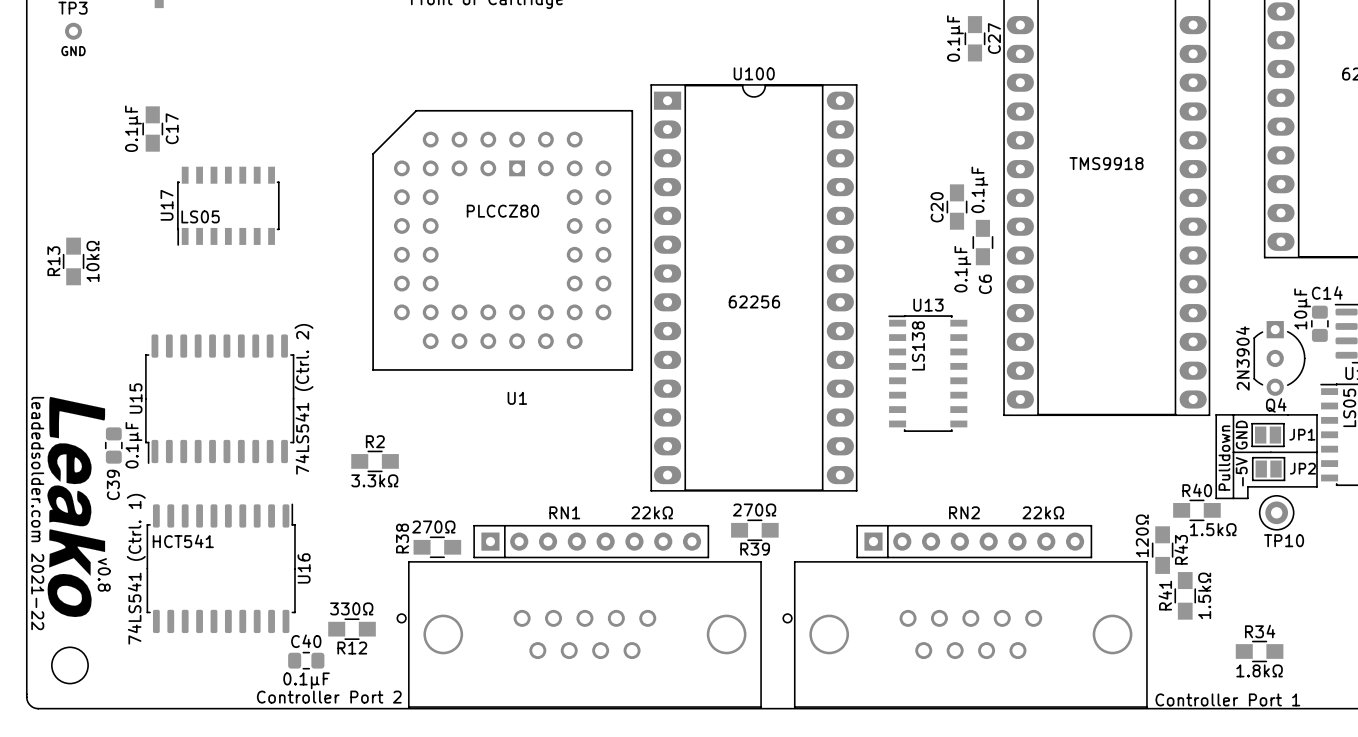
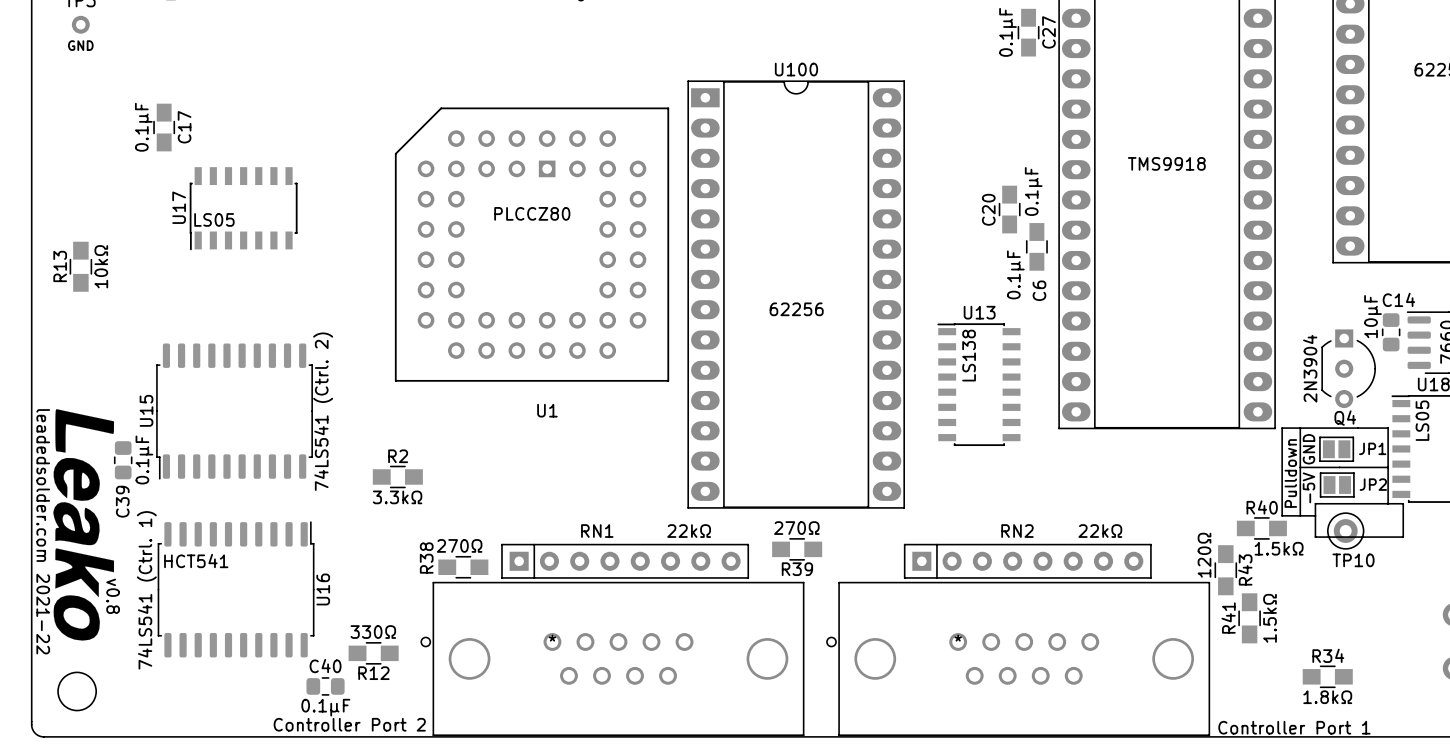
line: none -> (1388, 503) (1403, 503) (1403, 537) (1315, 537) (1315, 515)
part text: none -> * (552, 638)
part text: none -> * (958, 638)

